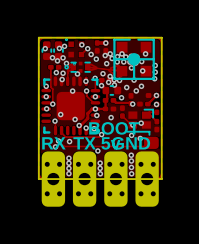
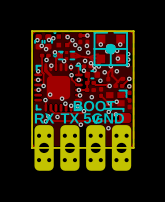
via: (110, 53) -> none
via: none -> (41, 45)
via: (117, 56) -> none
via: (52, 57) -> none
via: (63, 57) -> none
via: (125, 57) -> none
via: (112, 58) -> none
via: none -> (46, 49)
via: (57, 60) -> none
via: (117, 61) -> none
via: (123, 61) -> none
via: (131, 67) -> none
via: (63, 73) -> none
track: none -> (45, 67) (45, 70) (50, 75)
via: (108, 82) -> none
via: (136, 90) -> none
via: (72, 91) -> none
track: none -> (108, 79) (110, 66) (112, 75) (118, 81)
track: none -> (122, 78) (115, 85)
track: (95, 109) (92, 109) (87, 113) (87, 118) (79, 125) -> none
via: (68, 158) -> none
via: (131, 161) -> none
via: (68, 163) -> none
via: (100, 163) -> none
via: (131, 167) -> none
via: (68, 168) -> none
via: (100, 168) -> none
via: (68, 173) -> none
via: (100, 173) -> none
via: (131, 173) -> none

